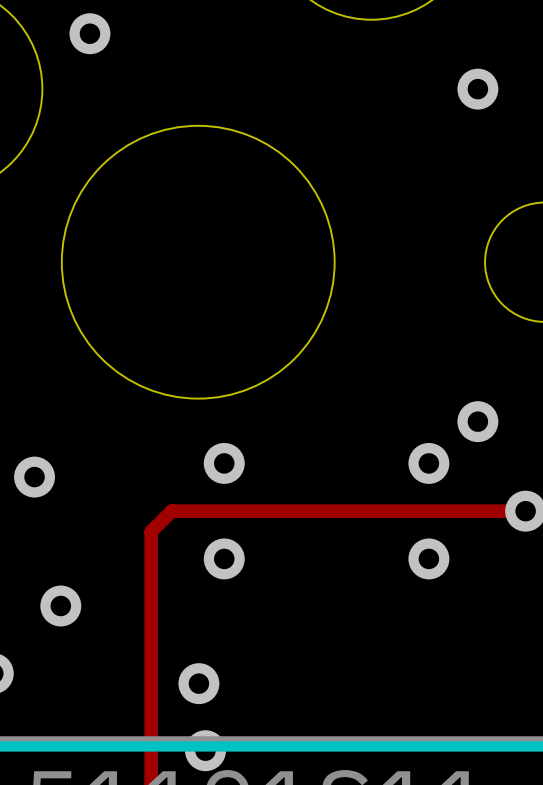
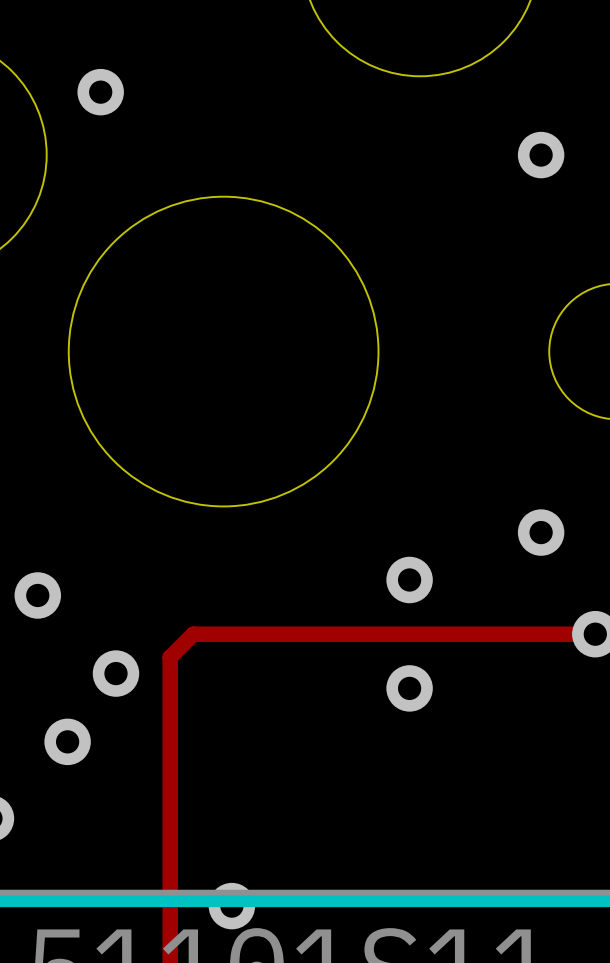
via: (224, 463) -> none
via: none -> (409, 579)
via: (428, 463) -> none
via: none -> (115, 673)
via: (224, 558) -> none
via: none -> (409, 688)
via: (428, 558) -> none
via: (198, 683) -> none

